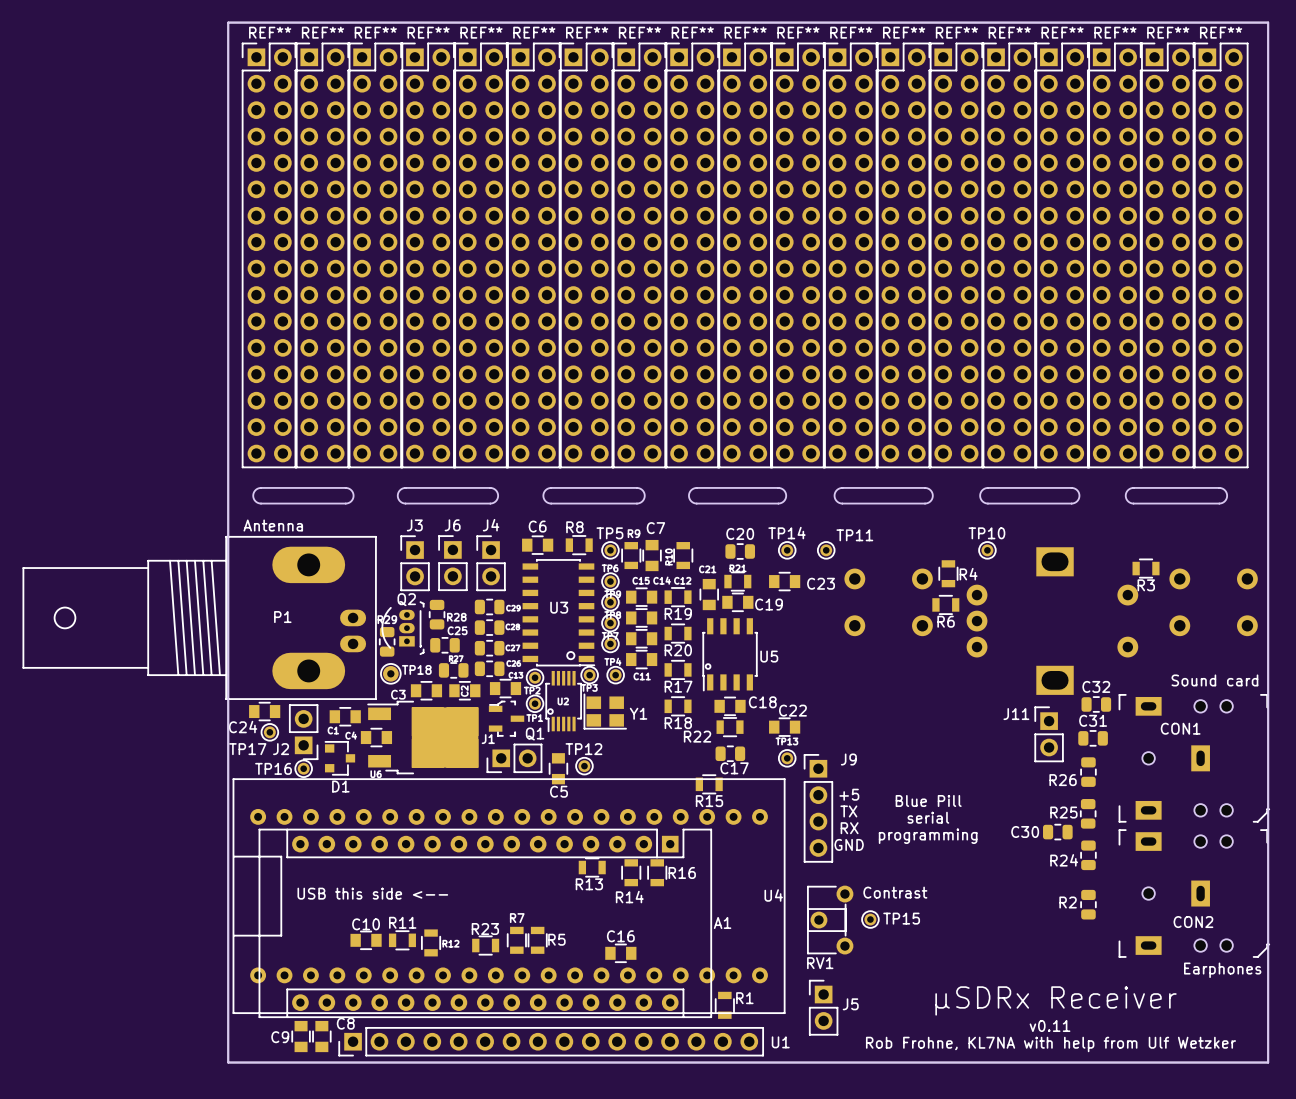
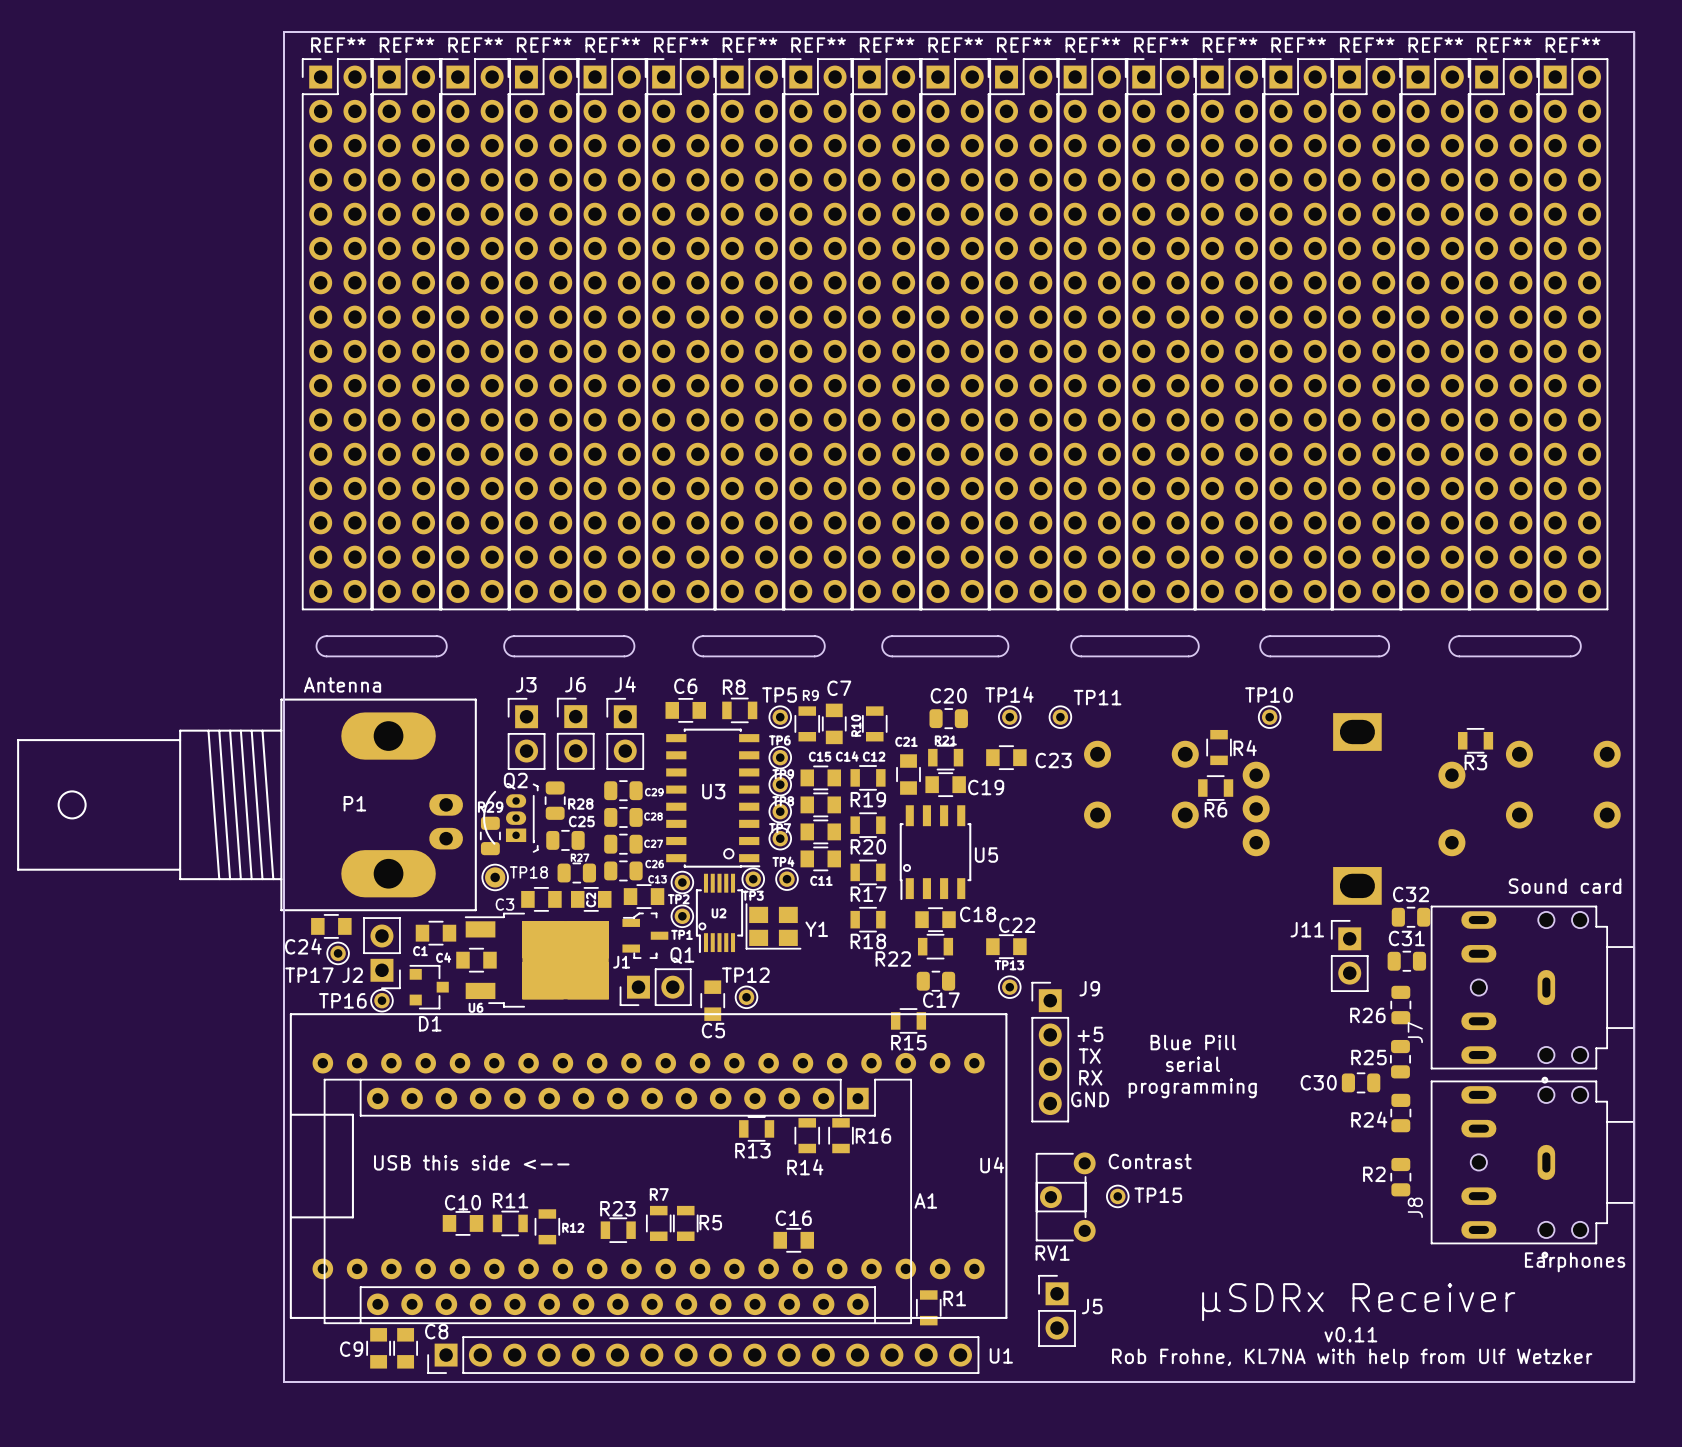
CON1: (1194, 758) -> none
J7: none -> (1532, 994)
CON2: (1194, 893) -> none
J8: none -> (1532, 1169)

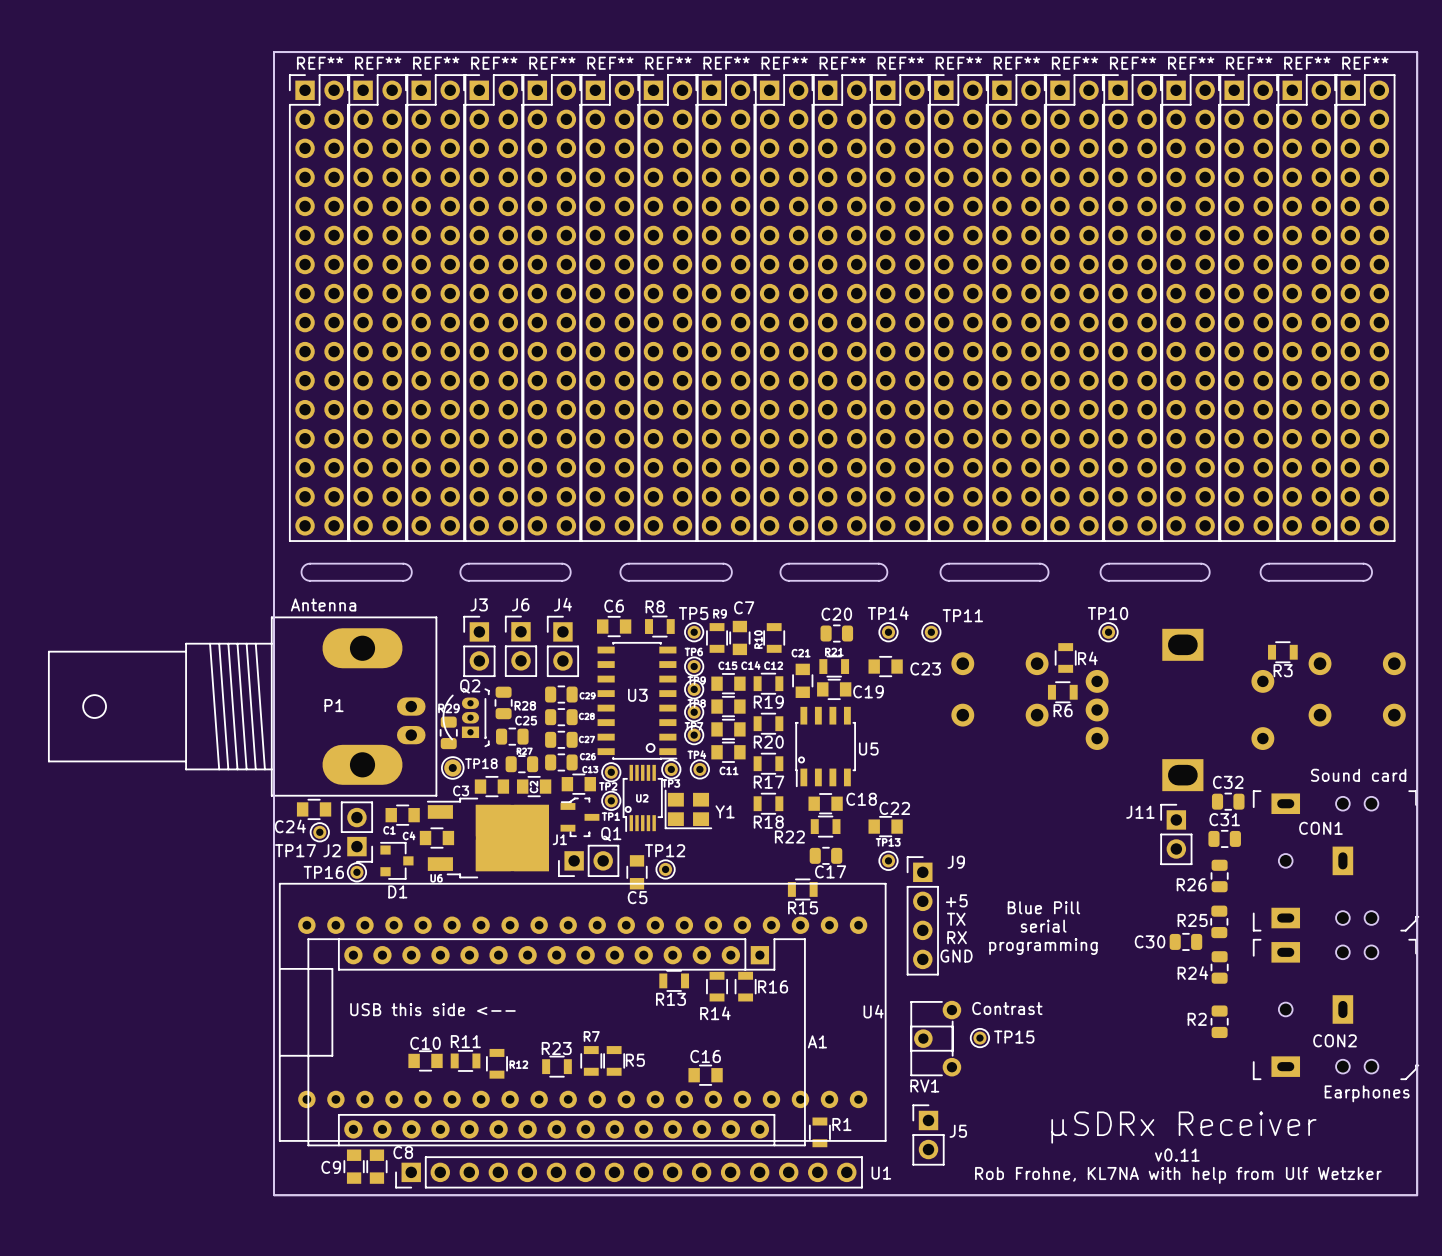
CON1: none -> (1336, 860)
J7: (1532, 994) -> none
CON2: none -> (1336, 1009)
J8: (1532, 1169) -> none

